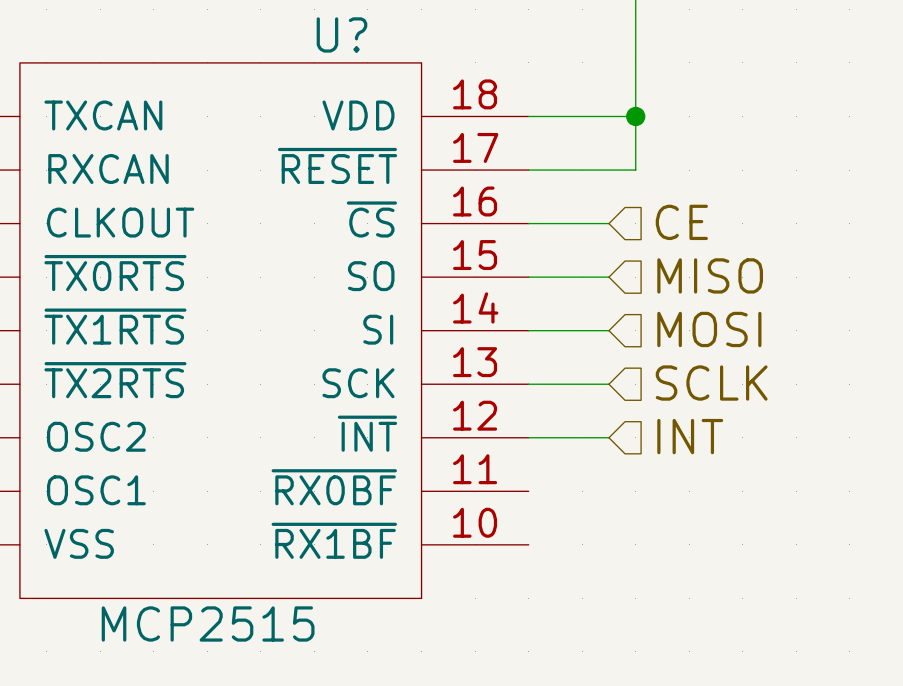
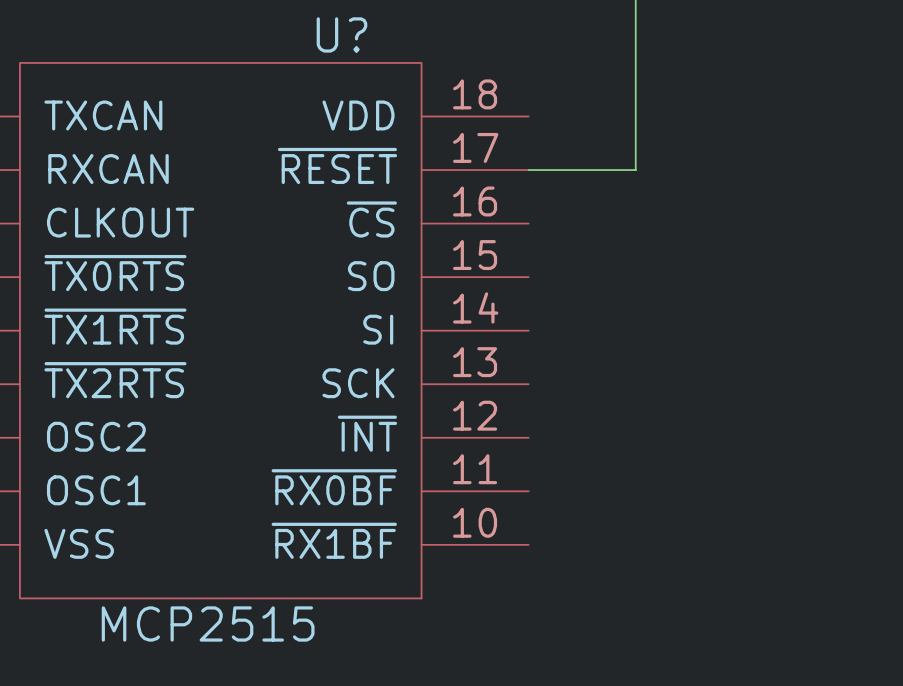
wire: (528, 116) (635, 116) -> none
junction: (635, 116) -> none
hierarchical label: CE (681, 222) -> none
wire: (528, 223) (608, 223) -> none
hierarchical label: MISO (710, 275) -> none
wire: (528, 277) (608, 277) -> none
hierarchical label: MOSI (709, 329) -> none
wire: (528, 330) (608, 330) -> none
hierarchical label: SCLK (711, 383) -> none
wire: (528, 384) (608, 384) -> none
hierarchical label: INT (690, 436) -> none
wire: (528, 437) (608, 437) -> none

